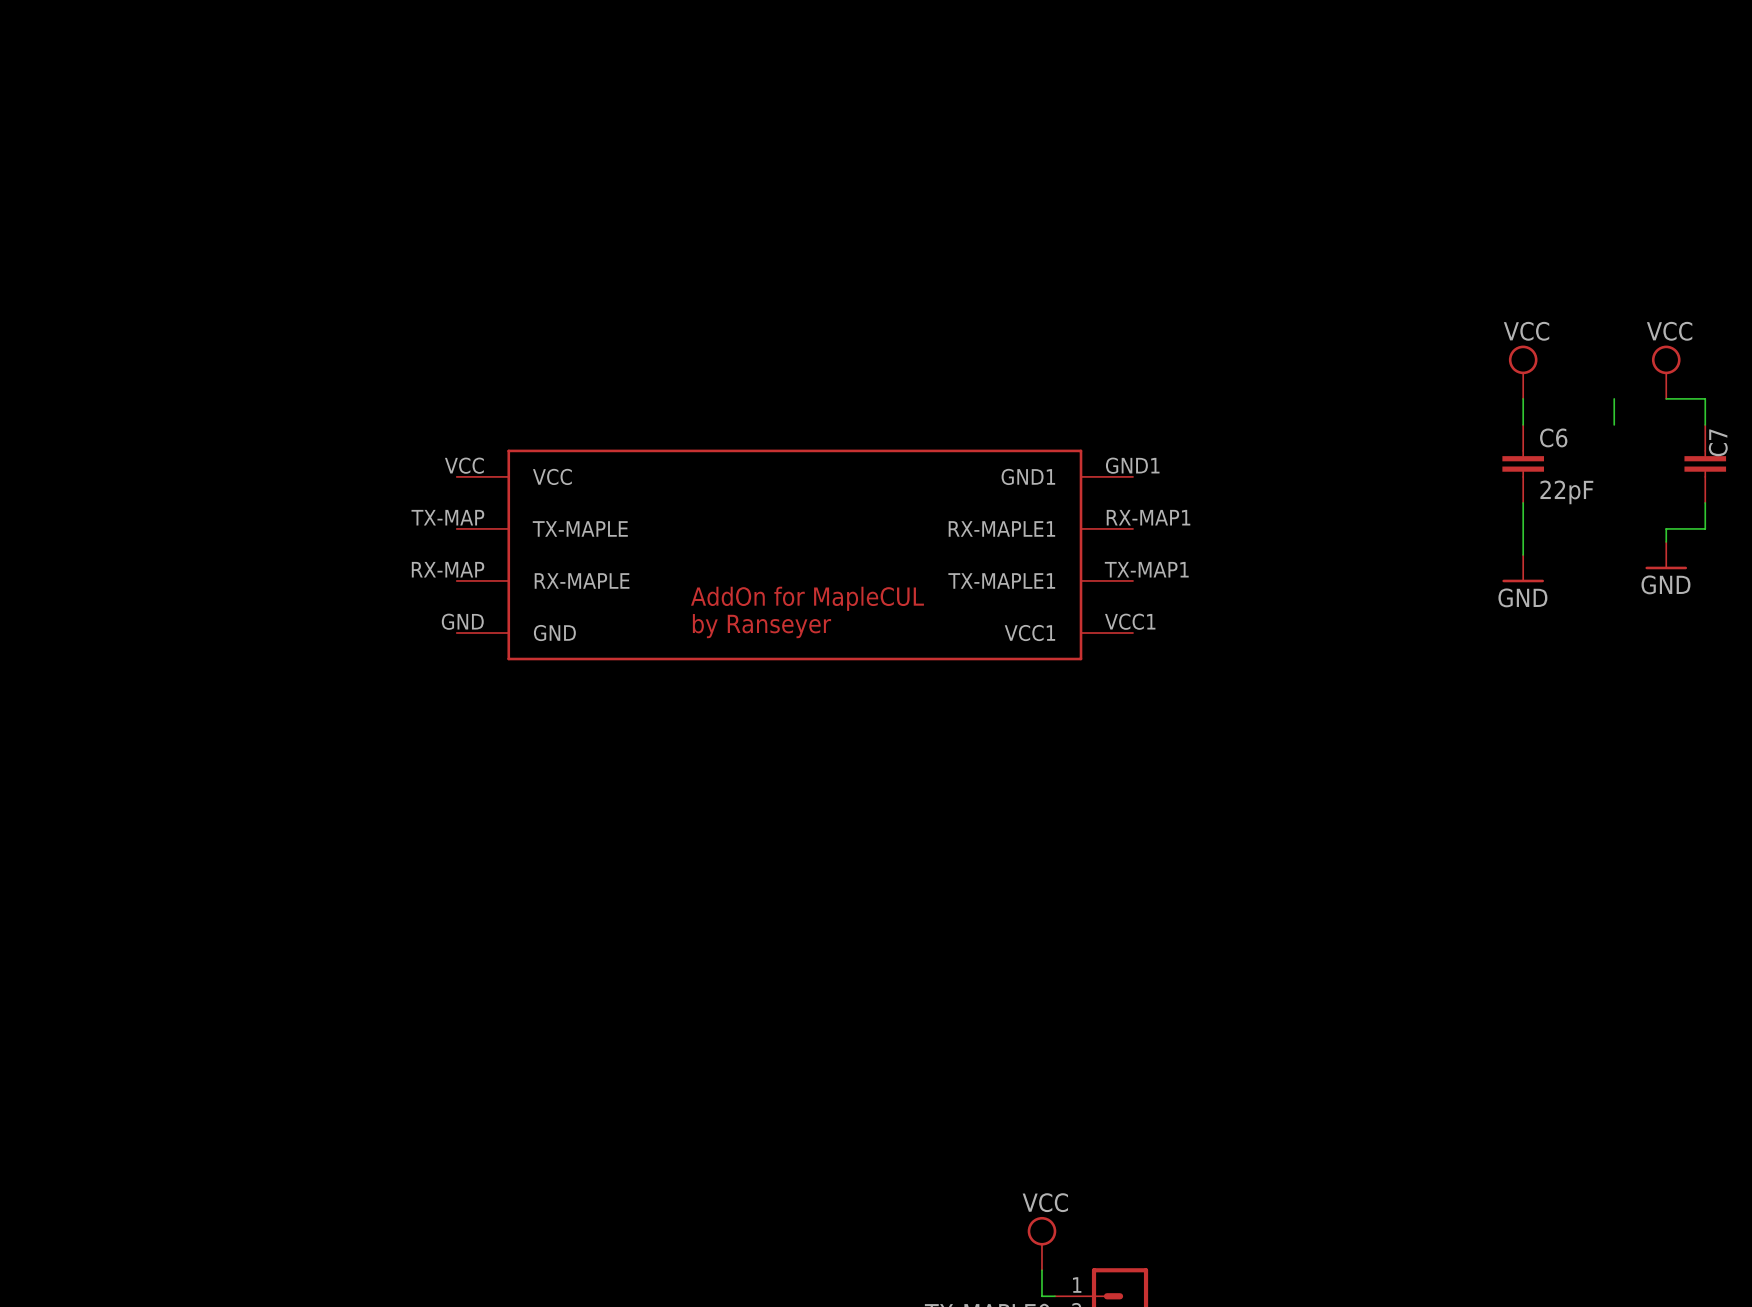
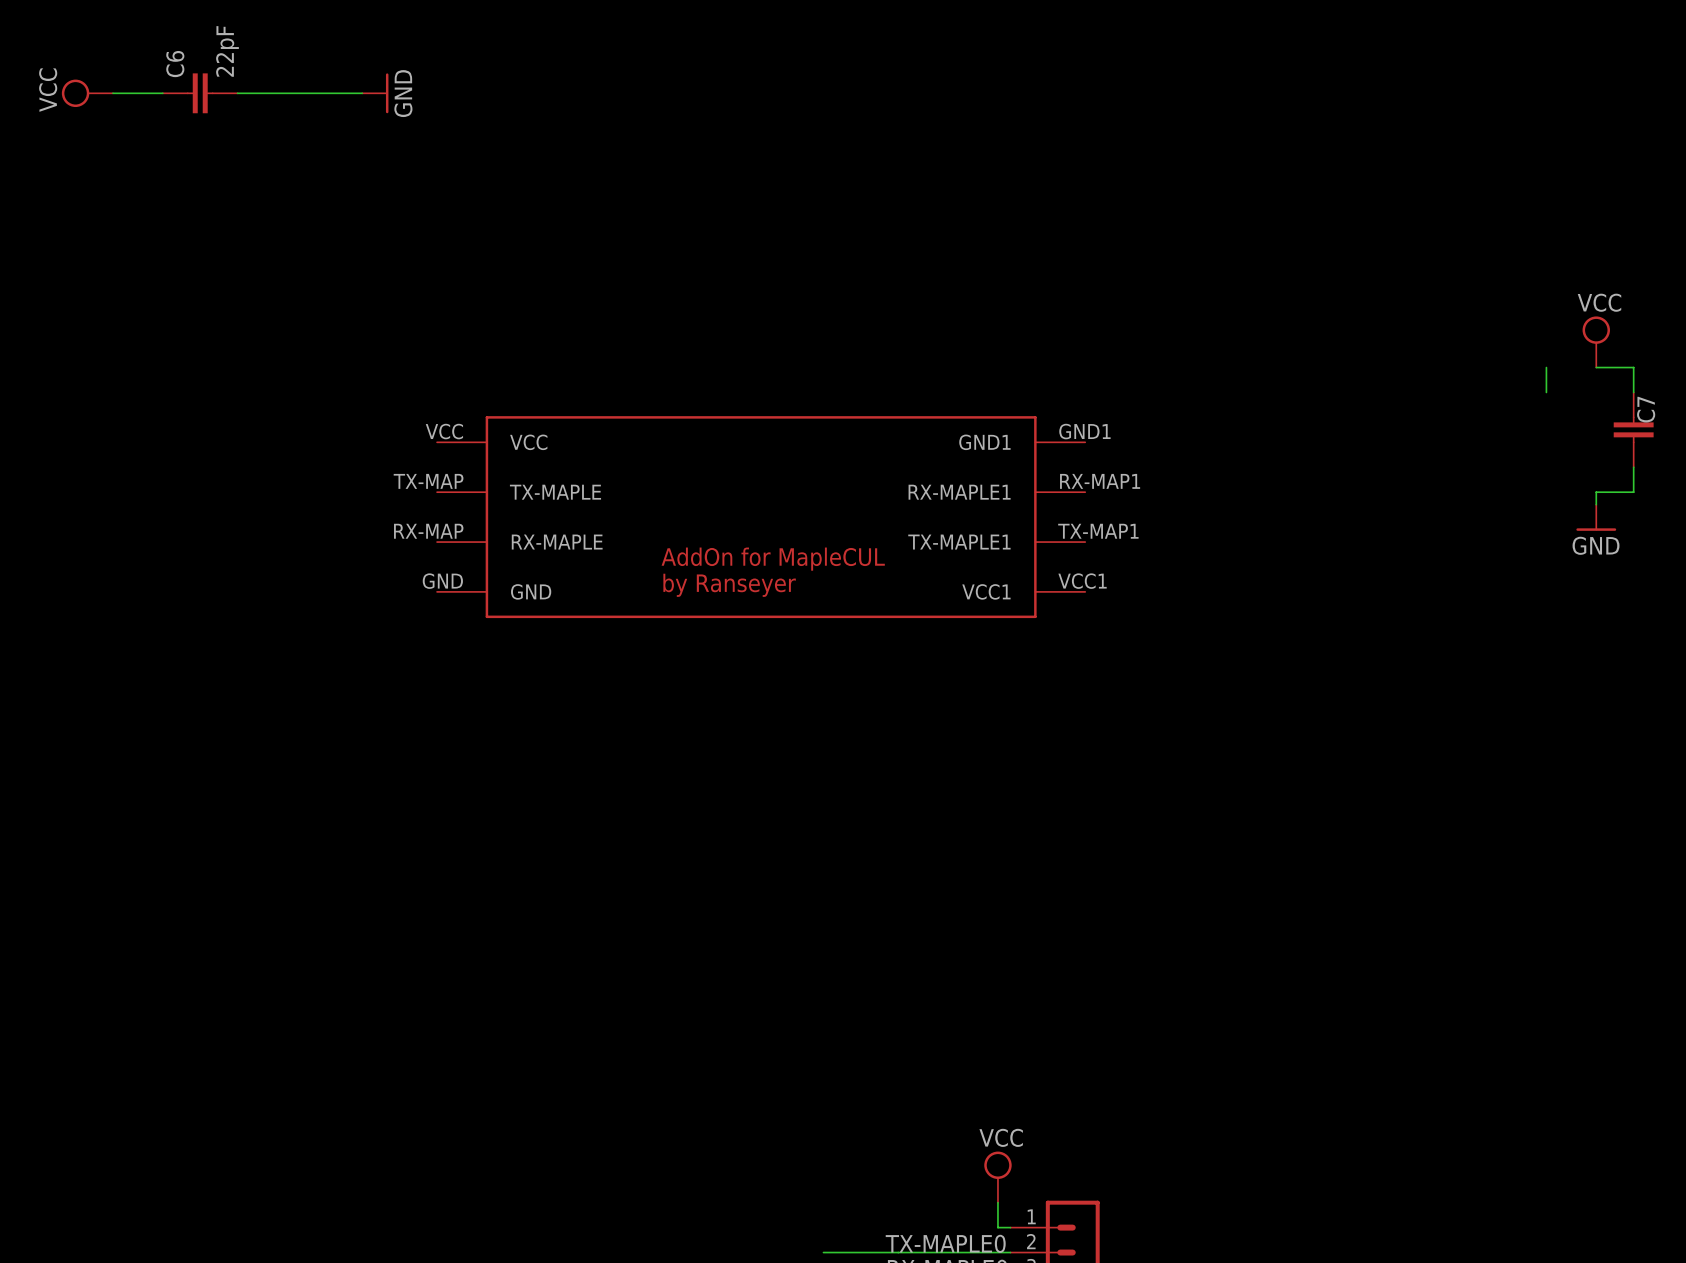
power symbol: none -> VCC (87, 93)
wire: none -> (112, 93) (162, 93)
wire: none -> (237, 93) (362, 93)
power symbol: none -> GND (375, 93)
power symbol: VCC (1523, 372) -> none
wire: (1523, 398) (1523, 424) -> none
C6 name position: C6 (1553, 437) -> C6 (175, 64)
C6 rotation: 0° (1523, 463) -> 90° clockwise (200, 93)
C6 position: (1523, 463) -> (200, 93)
C6 value position: 22pF (1566, 492) -> 22pF (227, 51)
wire: (1523, 502) (1523, 554) -> none
power symbol: GND (1523, 568) -> none

